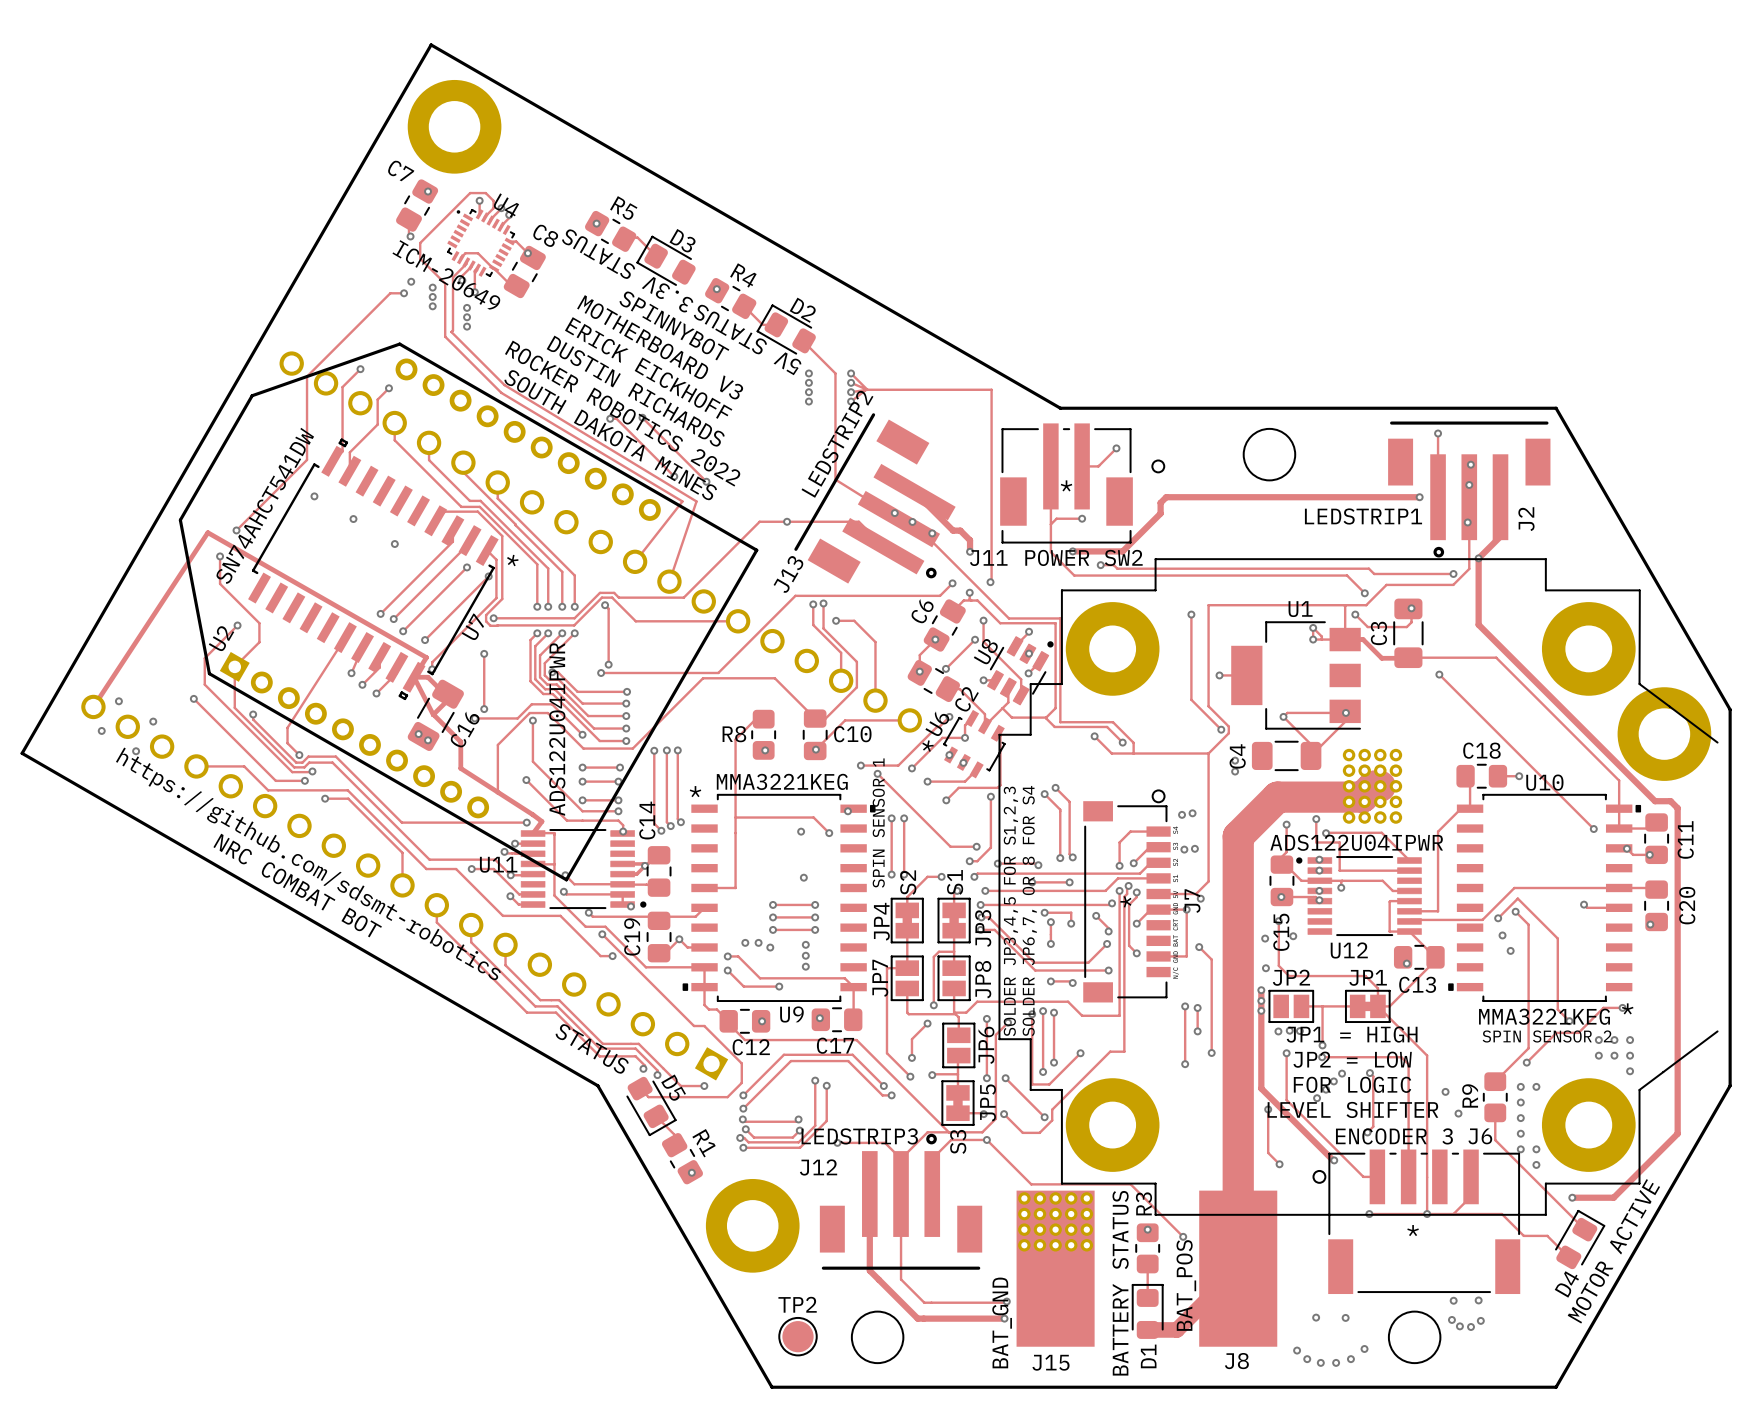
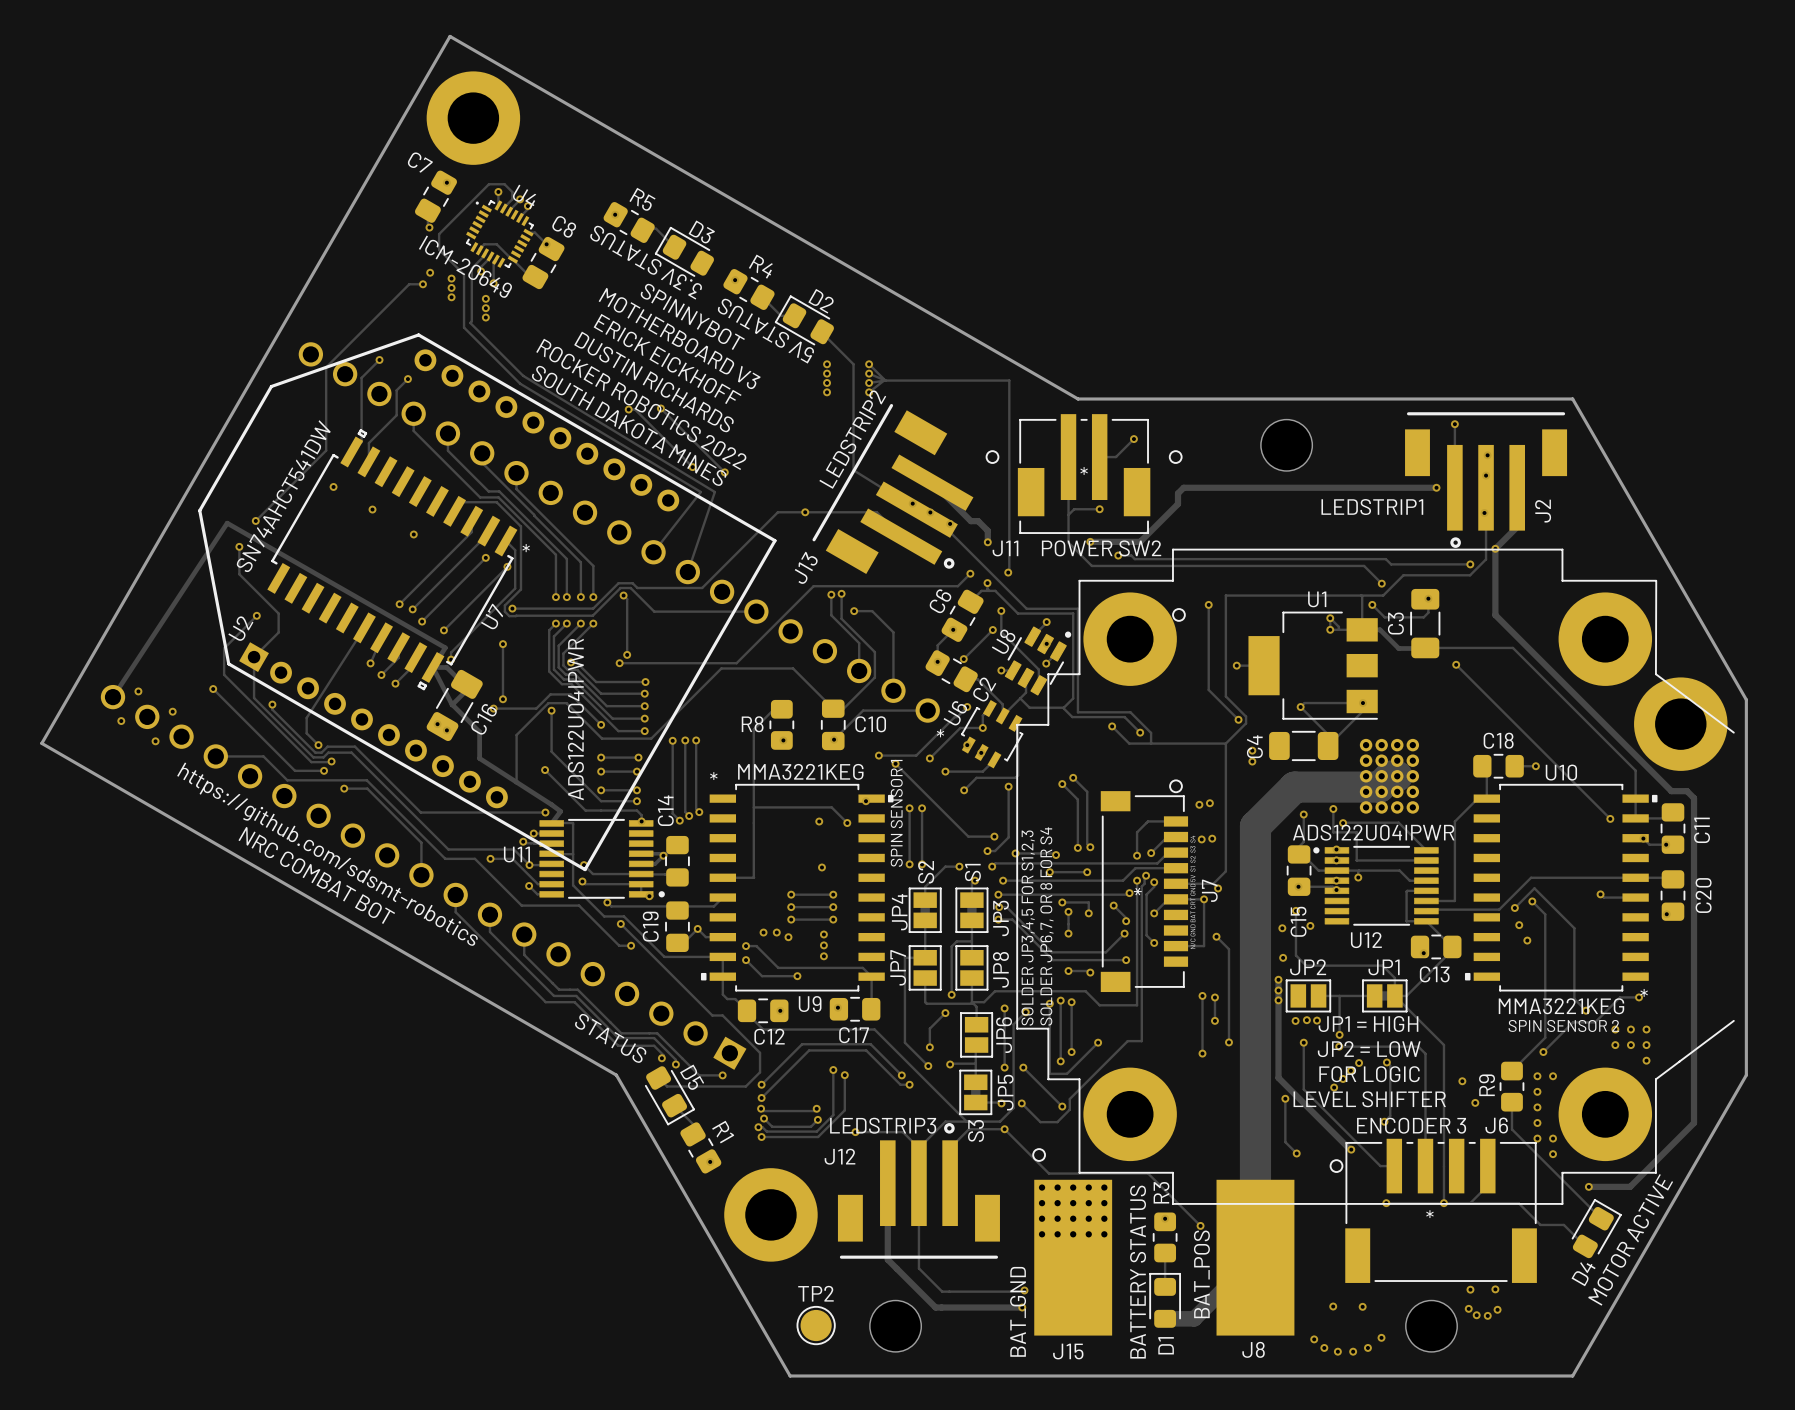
part: none -> (992, 457)
part: none -> (1178, 614)
part: none -> (1039, 1155)

